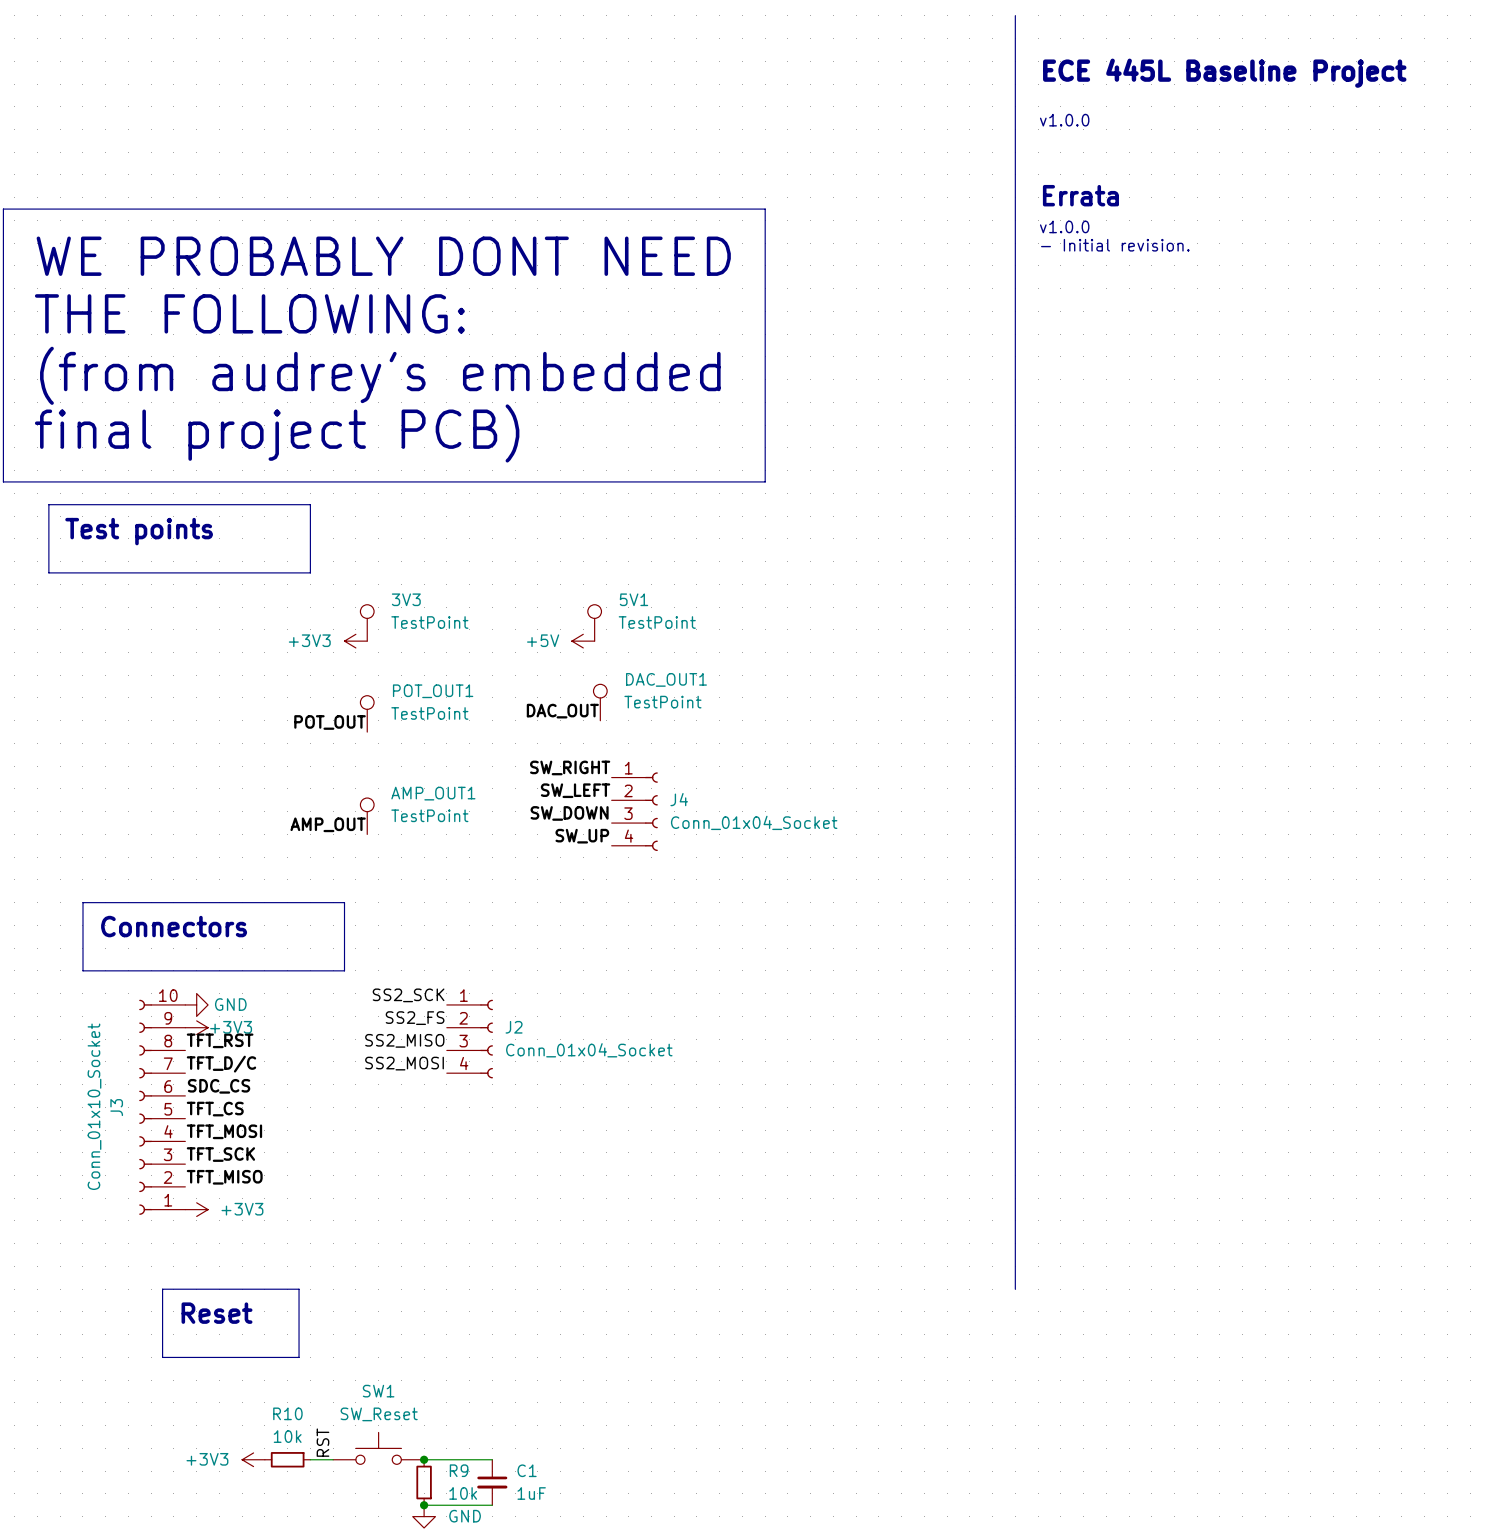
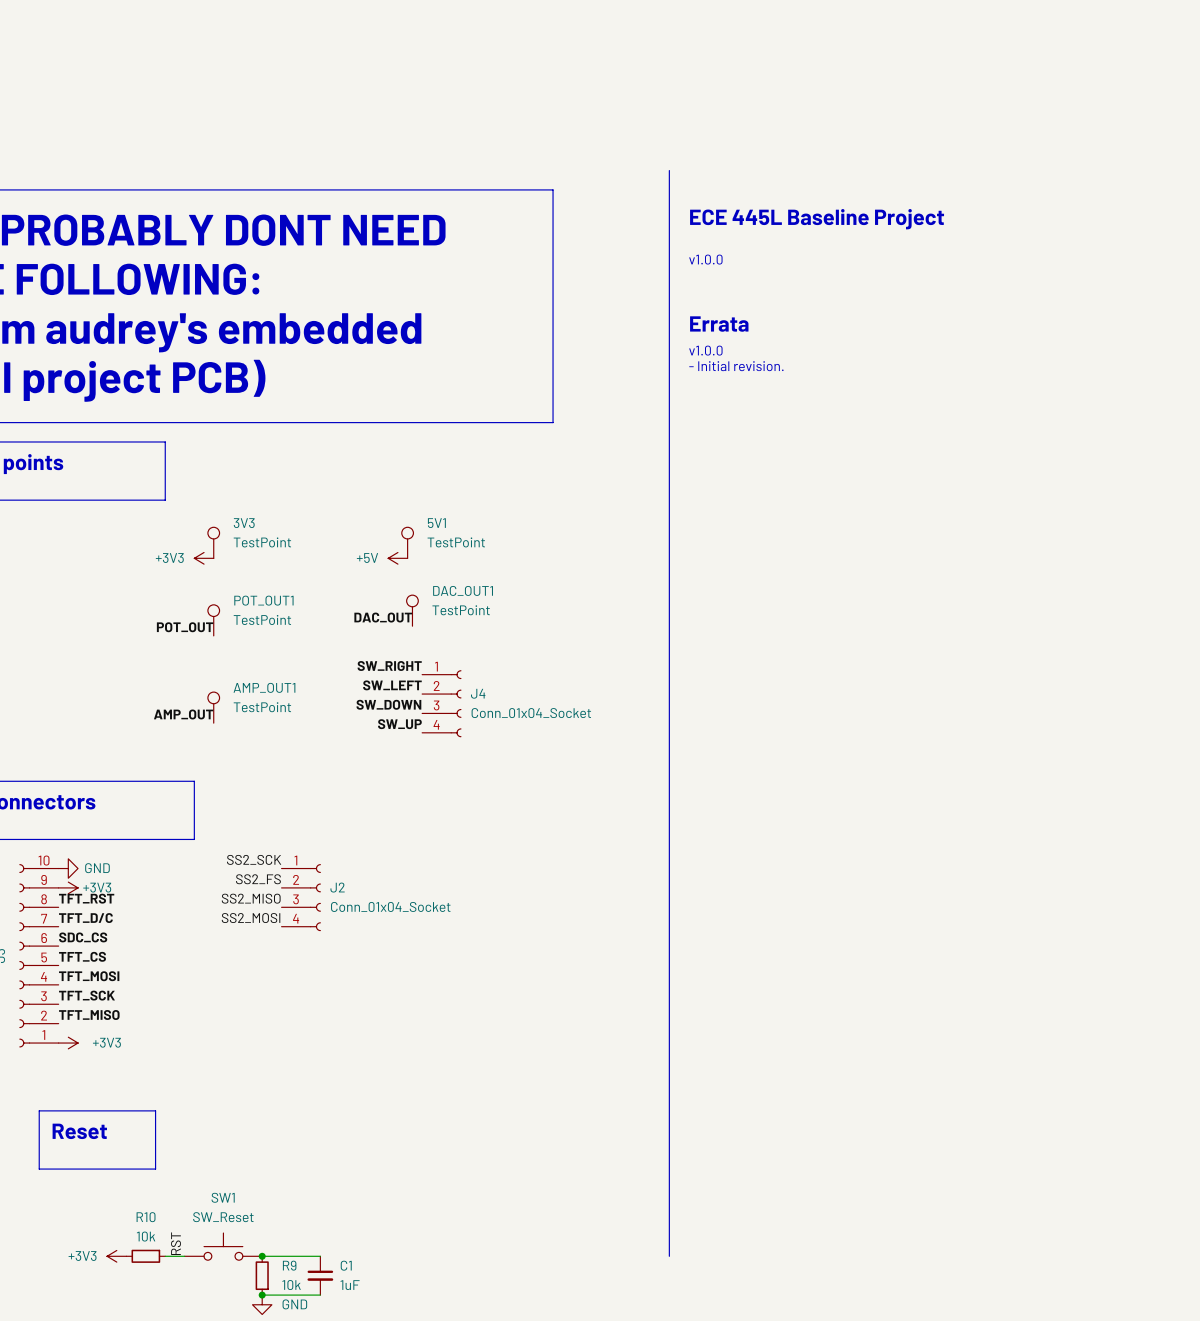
line: (1015, 15) (1015, 1289) -> (669, 170) (669, 1256)
text position: ECE 445L Baseline Project (1224, 73) -> ECE 445L Baseline Project (817, 219)
text: v1.0.0 (1064, 120) -> none
text position: Errata (1080, 195) -> Errata (719, 324)
text: v1.0.0 (1064, 226) -> none
text position: - Initial revision. (1115, 245) -> - Initial revision. (736, 366)
text: none -> v1.0.0 (705, 259)
text: none -> v1.0.0 (705, 350)

